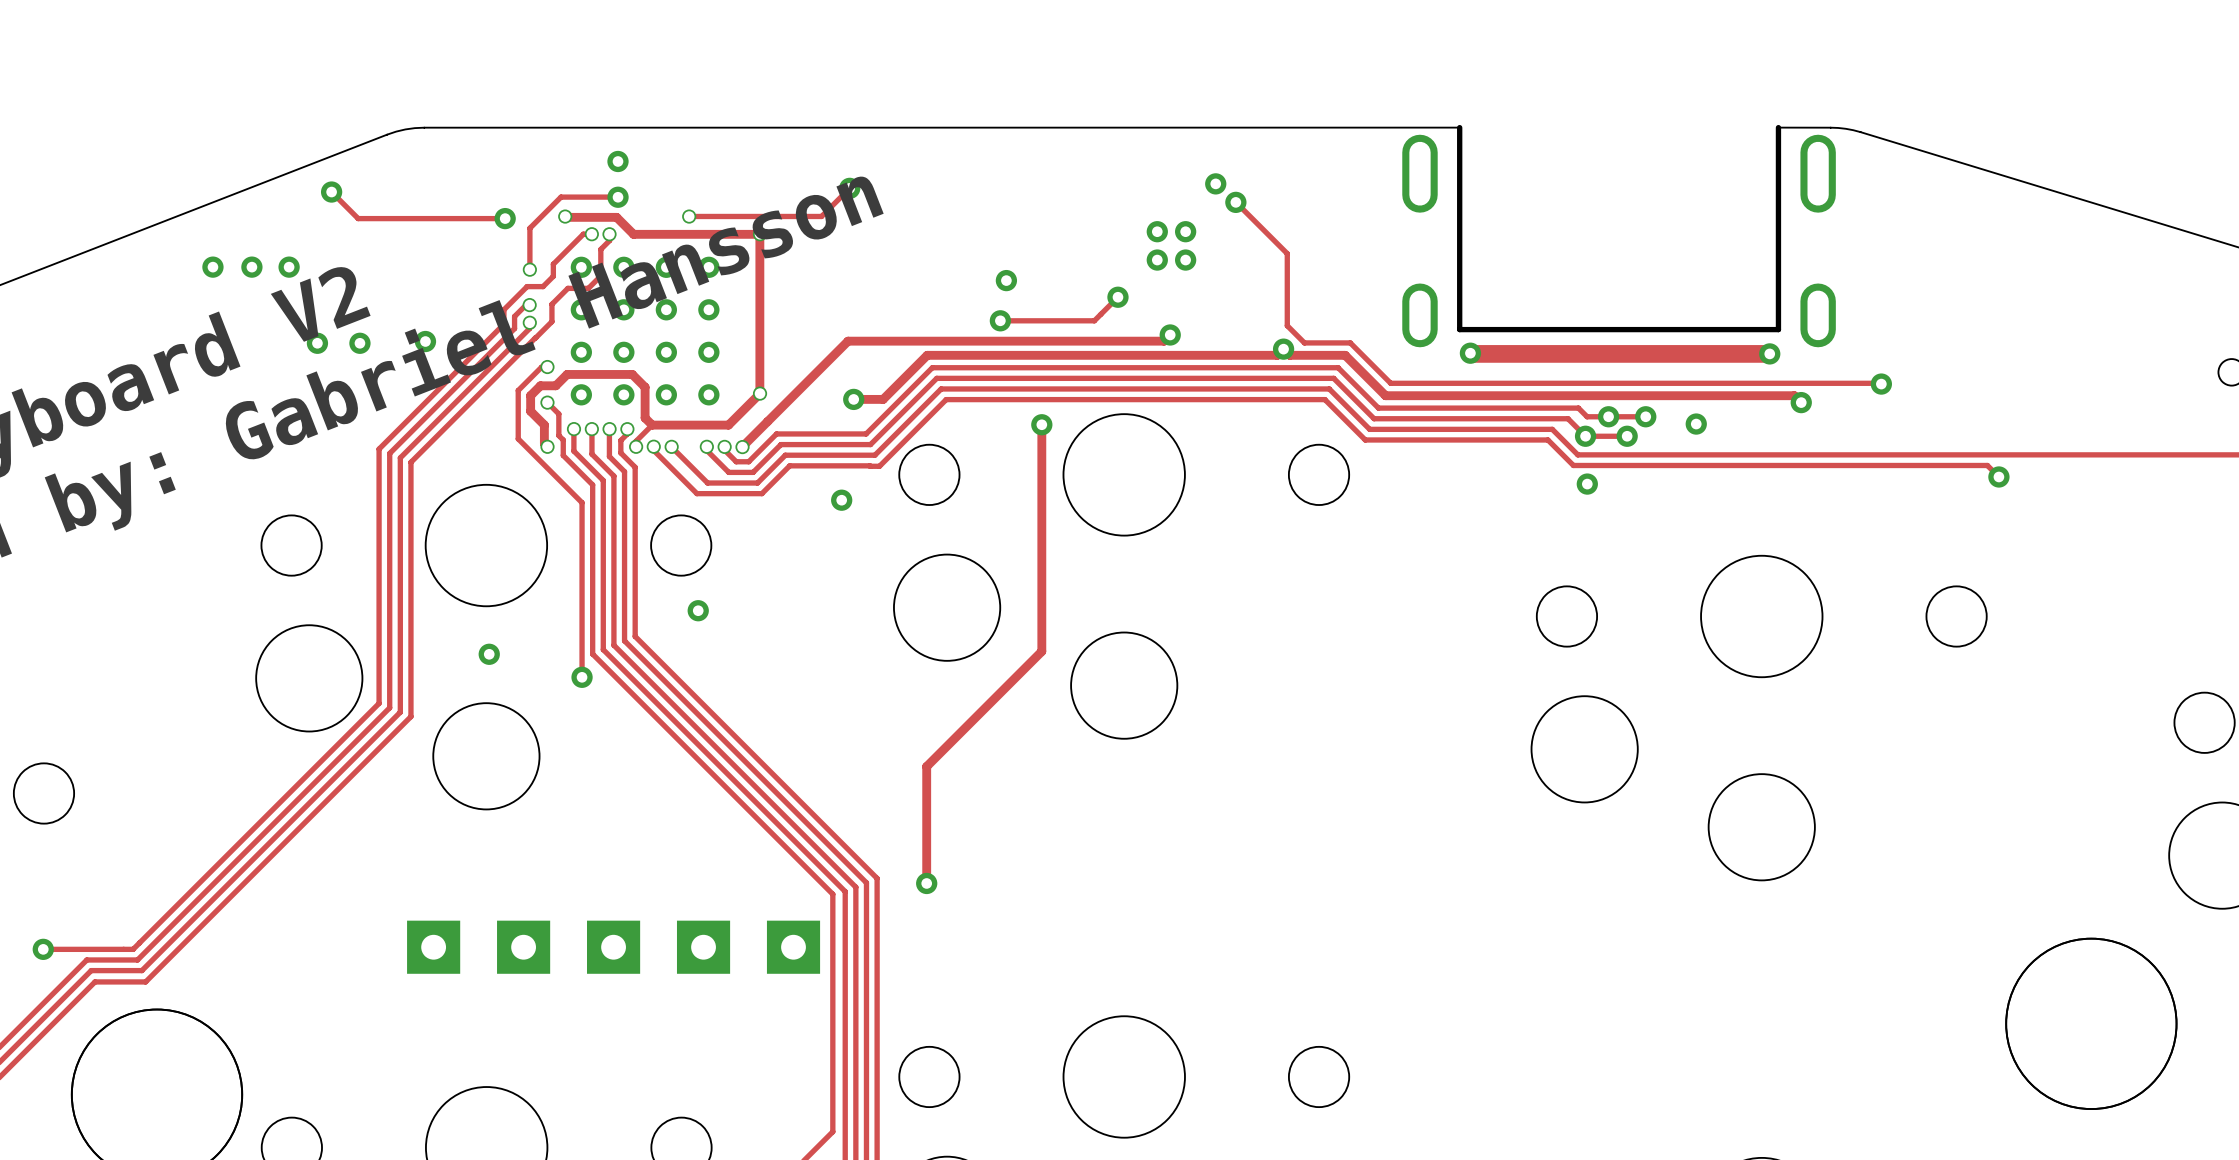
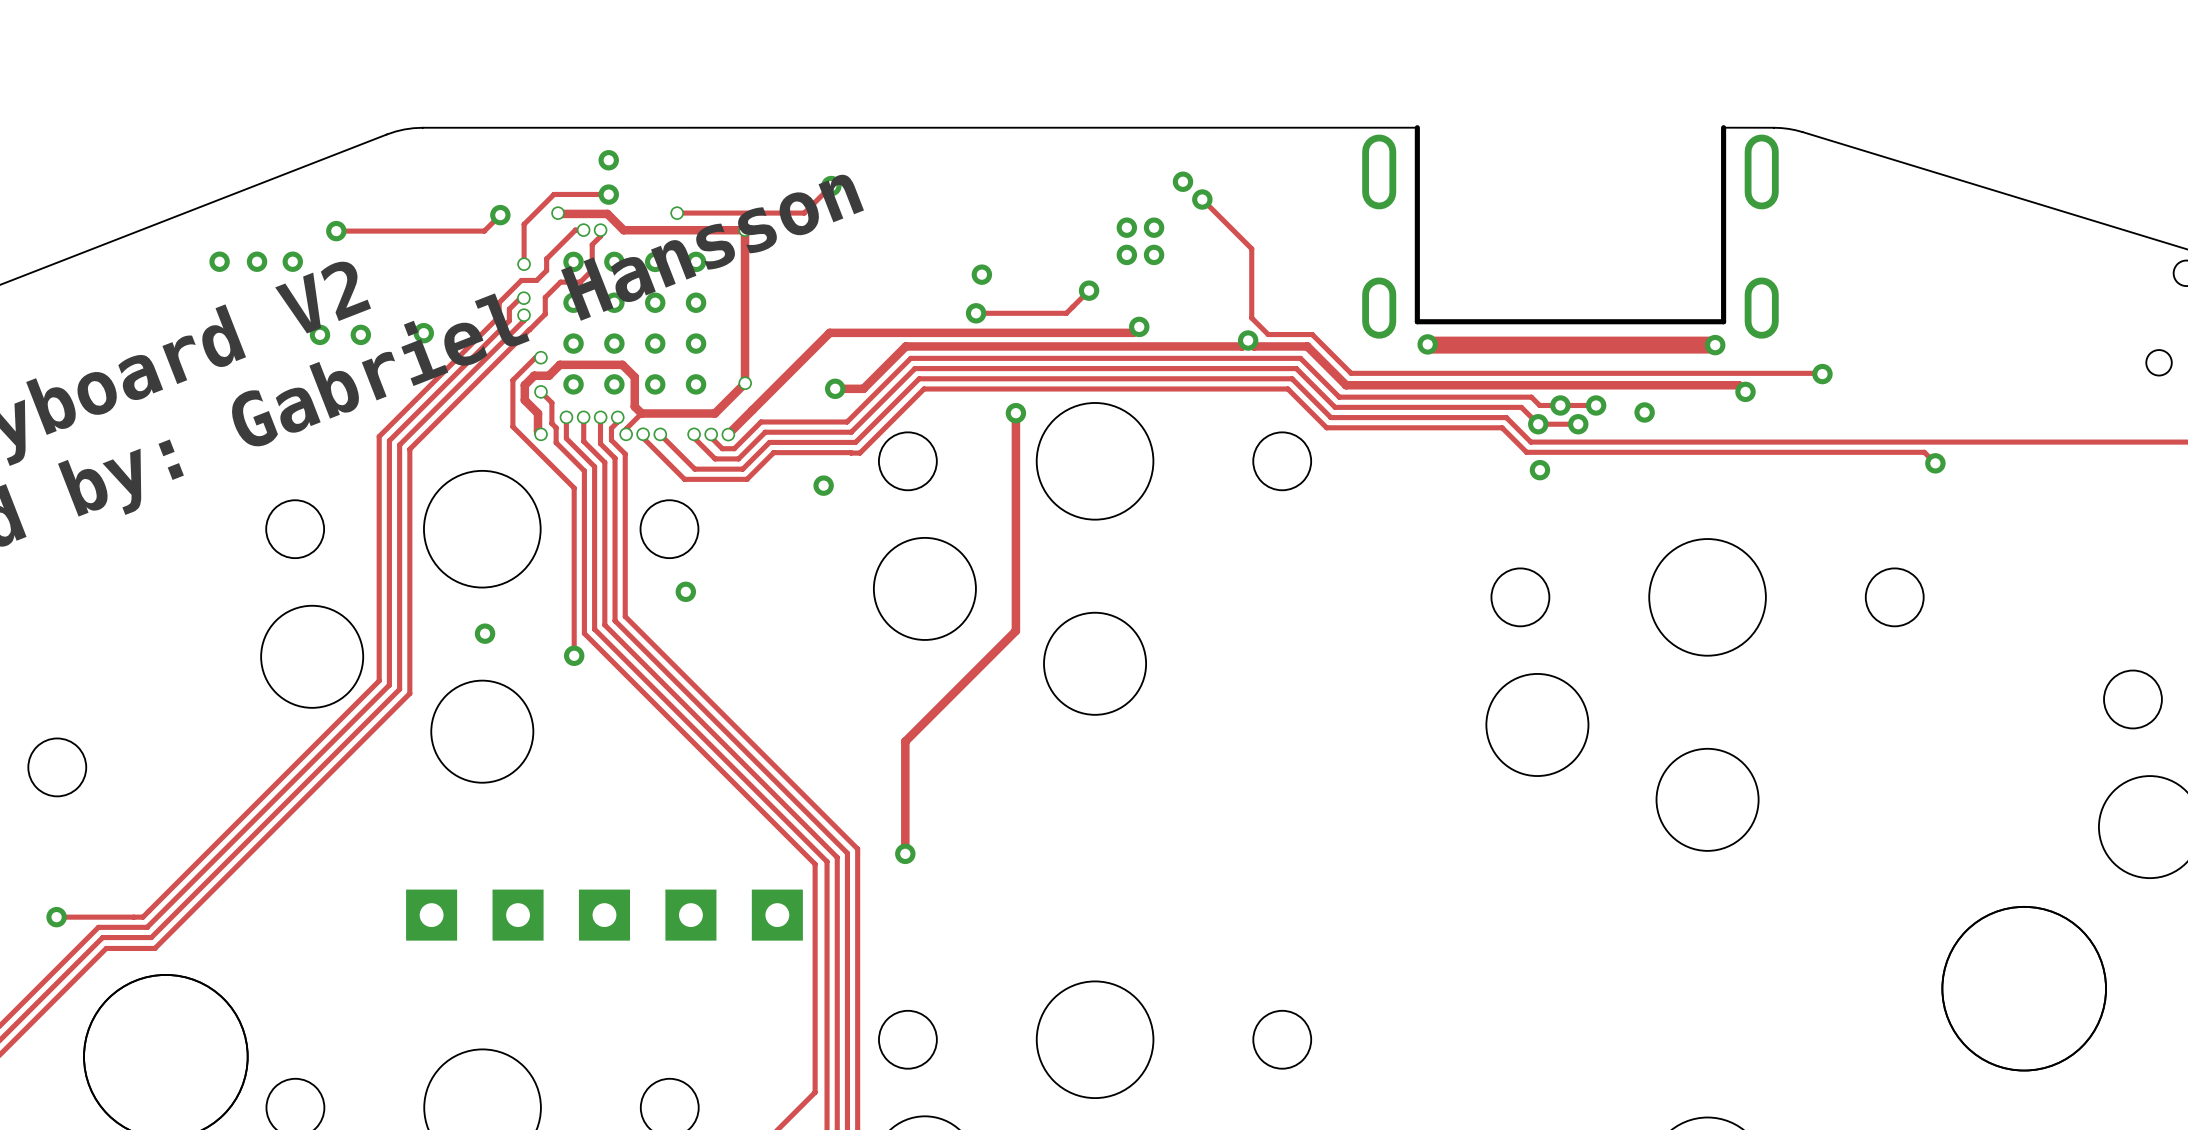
track: (331, 192) (358, 218) (505, 218) -> (336, 231) (484, 231) (500, 215)
via position: (331, 192) -> (336, 231)

